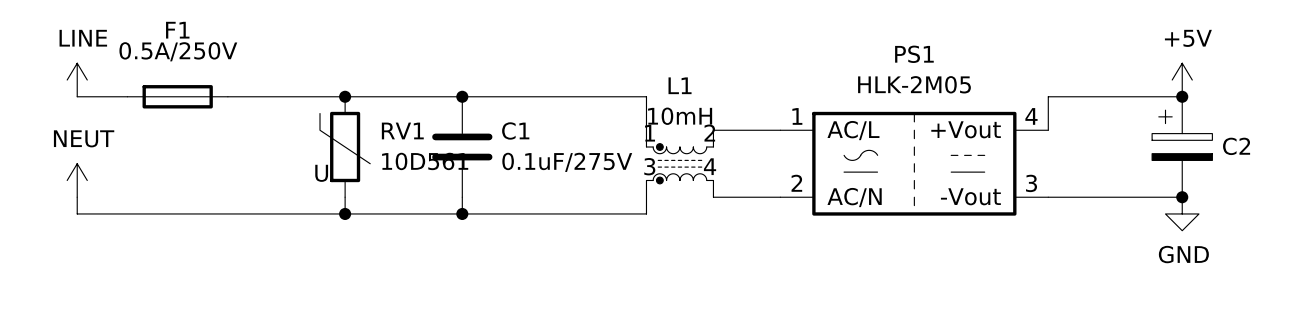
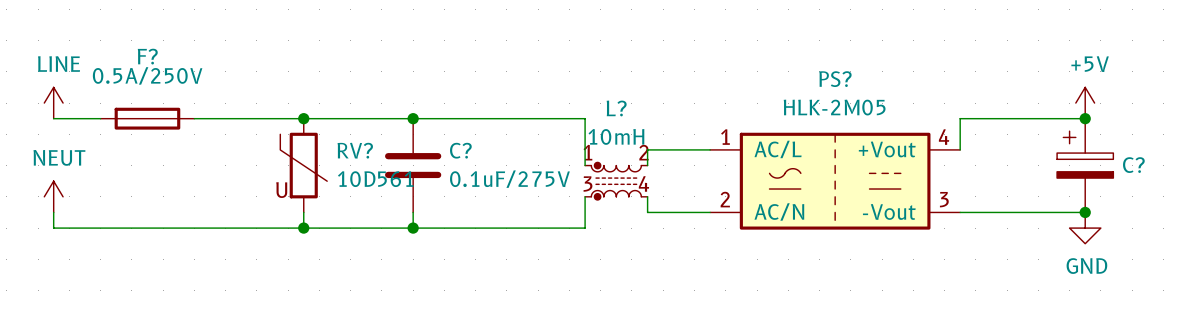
F1 name: F1 (177, 30) -> F? (147, 56)
PS1 name: PS1 (914, 54) -> PS? (835, 79)
L1 name: L1 (680, 85) -> L? (616, 108)
RV1 name: RV1 (402, 130) -> RV? (355, 150)
C1 name: C1 (515, 130) -> C? (460, 150)
C2 name: C2 (1236, 146) -> C? (1133, 165)

